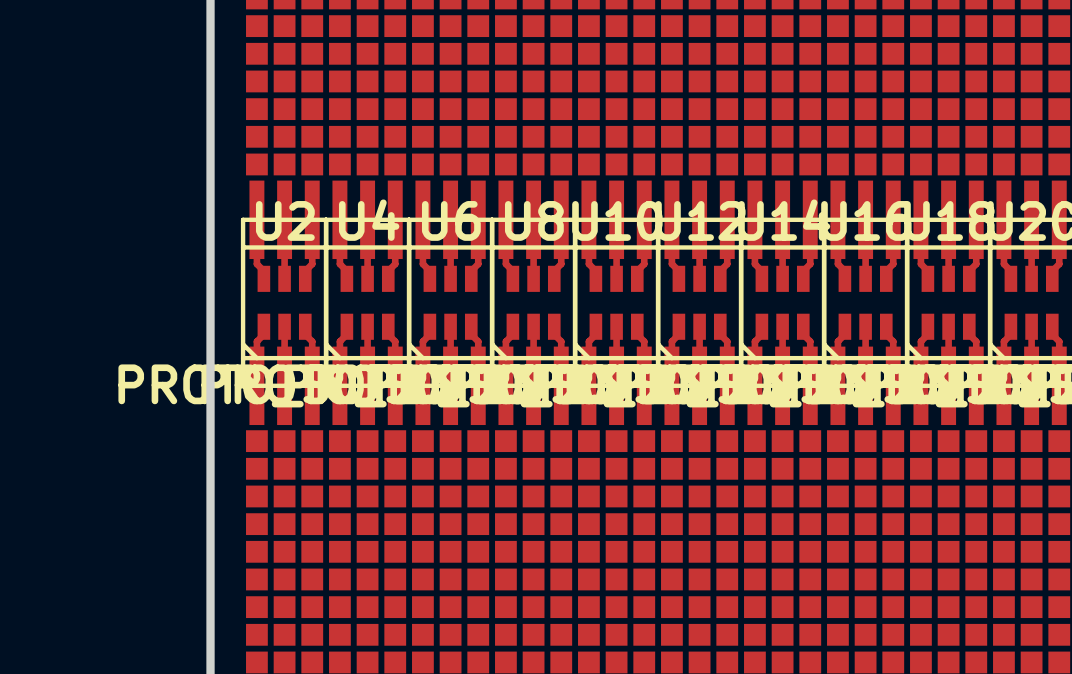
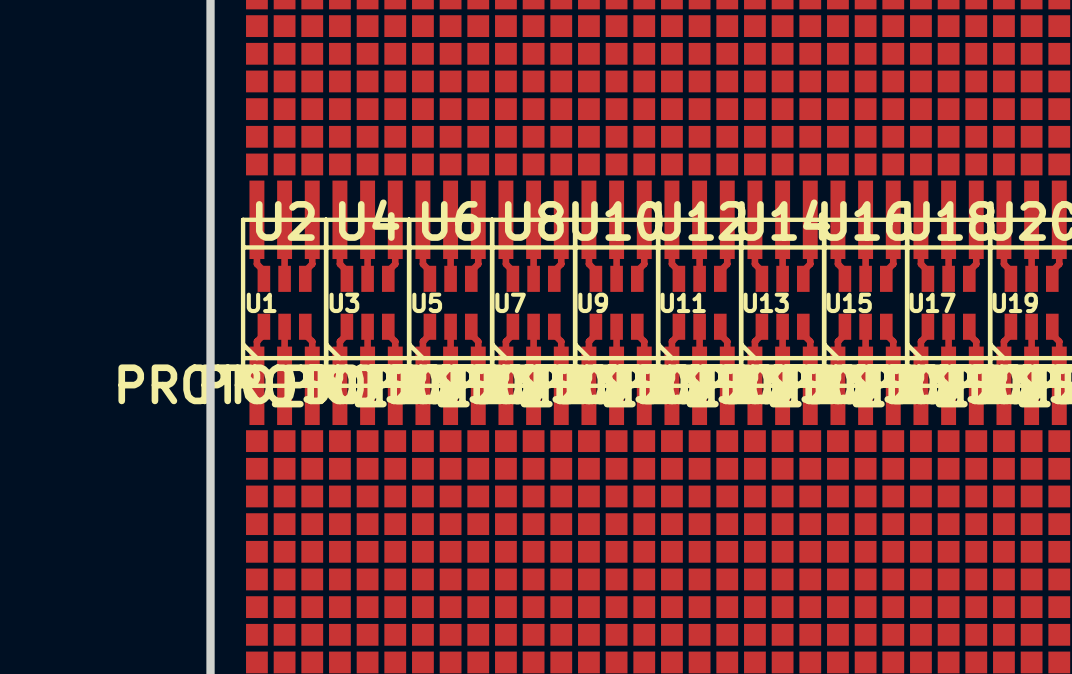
U1 name: none -> U1 (261, 302)
U3 name: none -> U3 (344, 302)
U5 name: none -> U5 (427, 302)
U7 name: none -> U7 (510, 302)
U9 name: none -> U9 (593, 302)
U11 name: none -> U11 (683, 302)
U13 name: none -> U13 (766, 302)
U15 name: none -> U15 (849, 302)
U17 name: none -> U17 (932, 302)
U19 name: none -> U19 (1015, 302)

